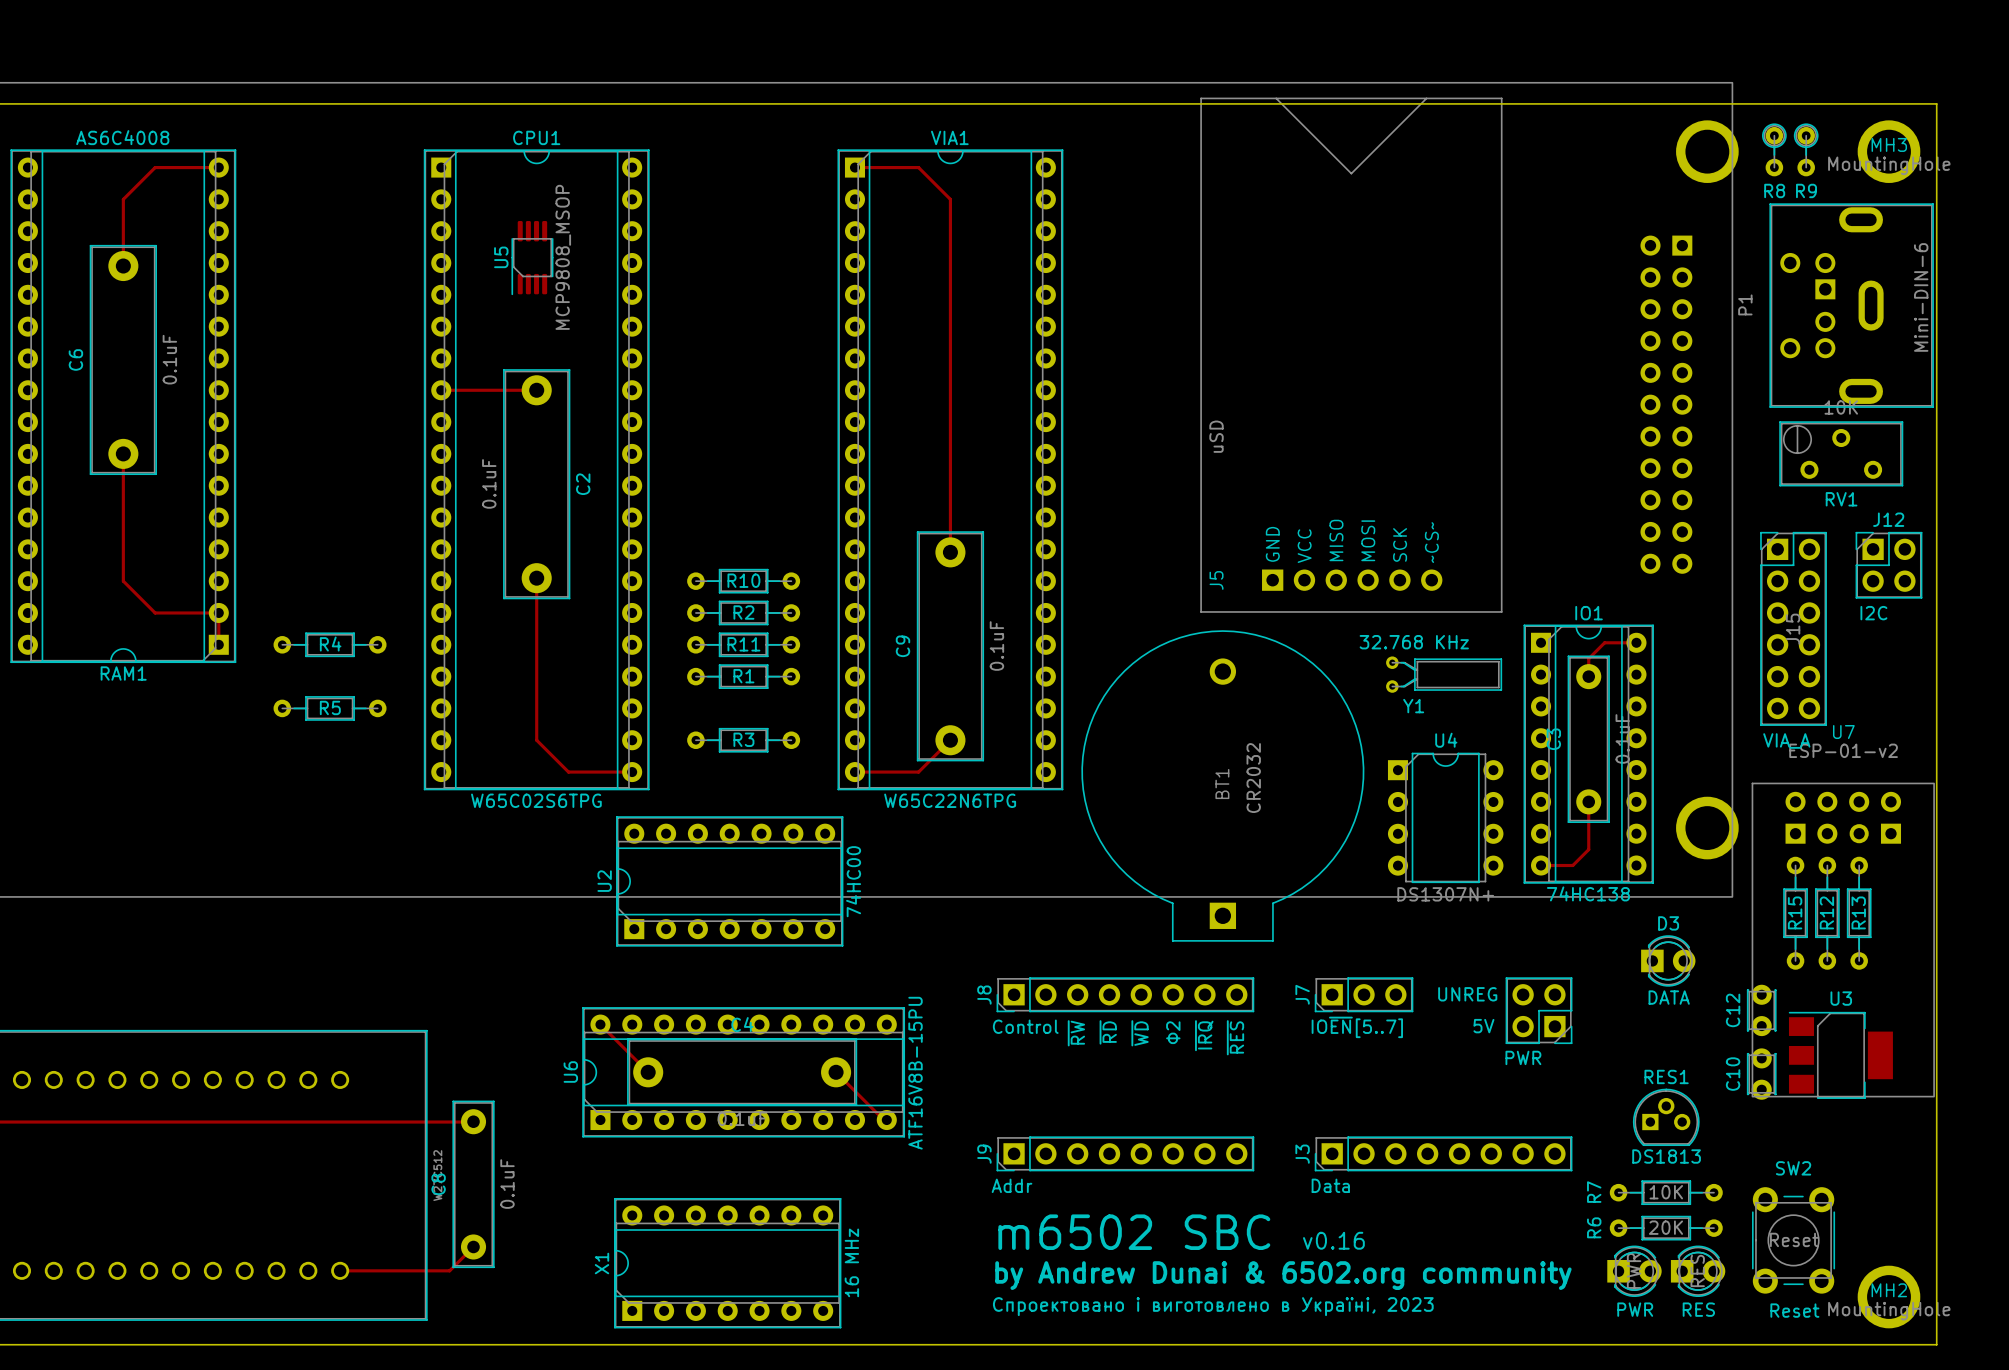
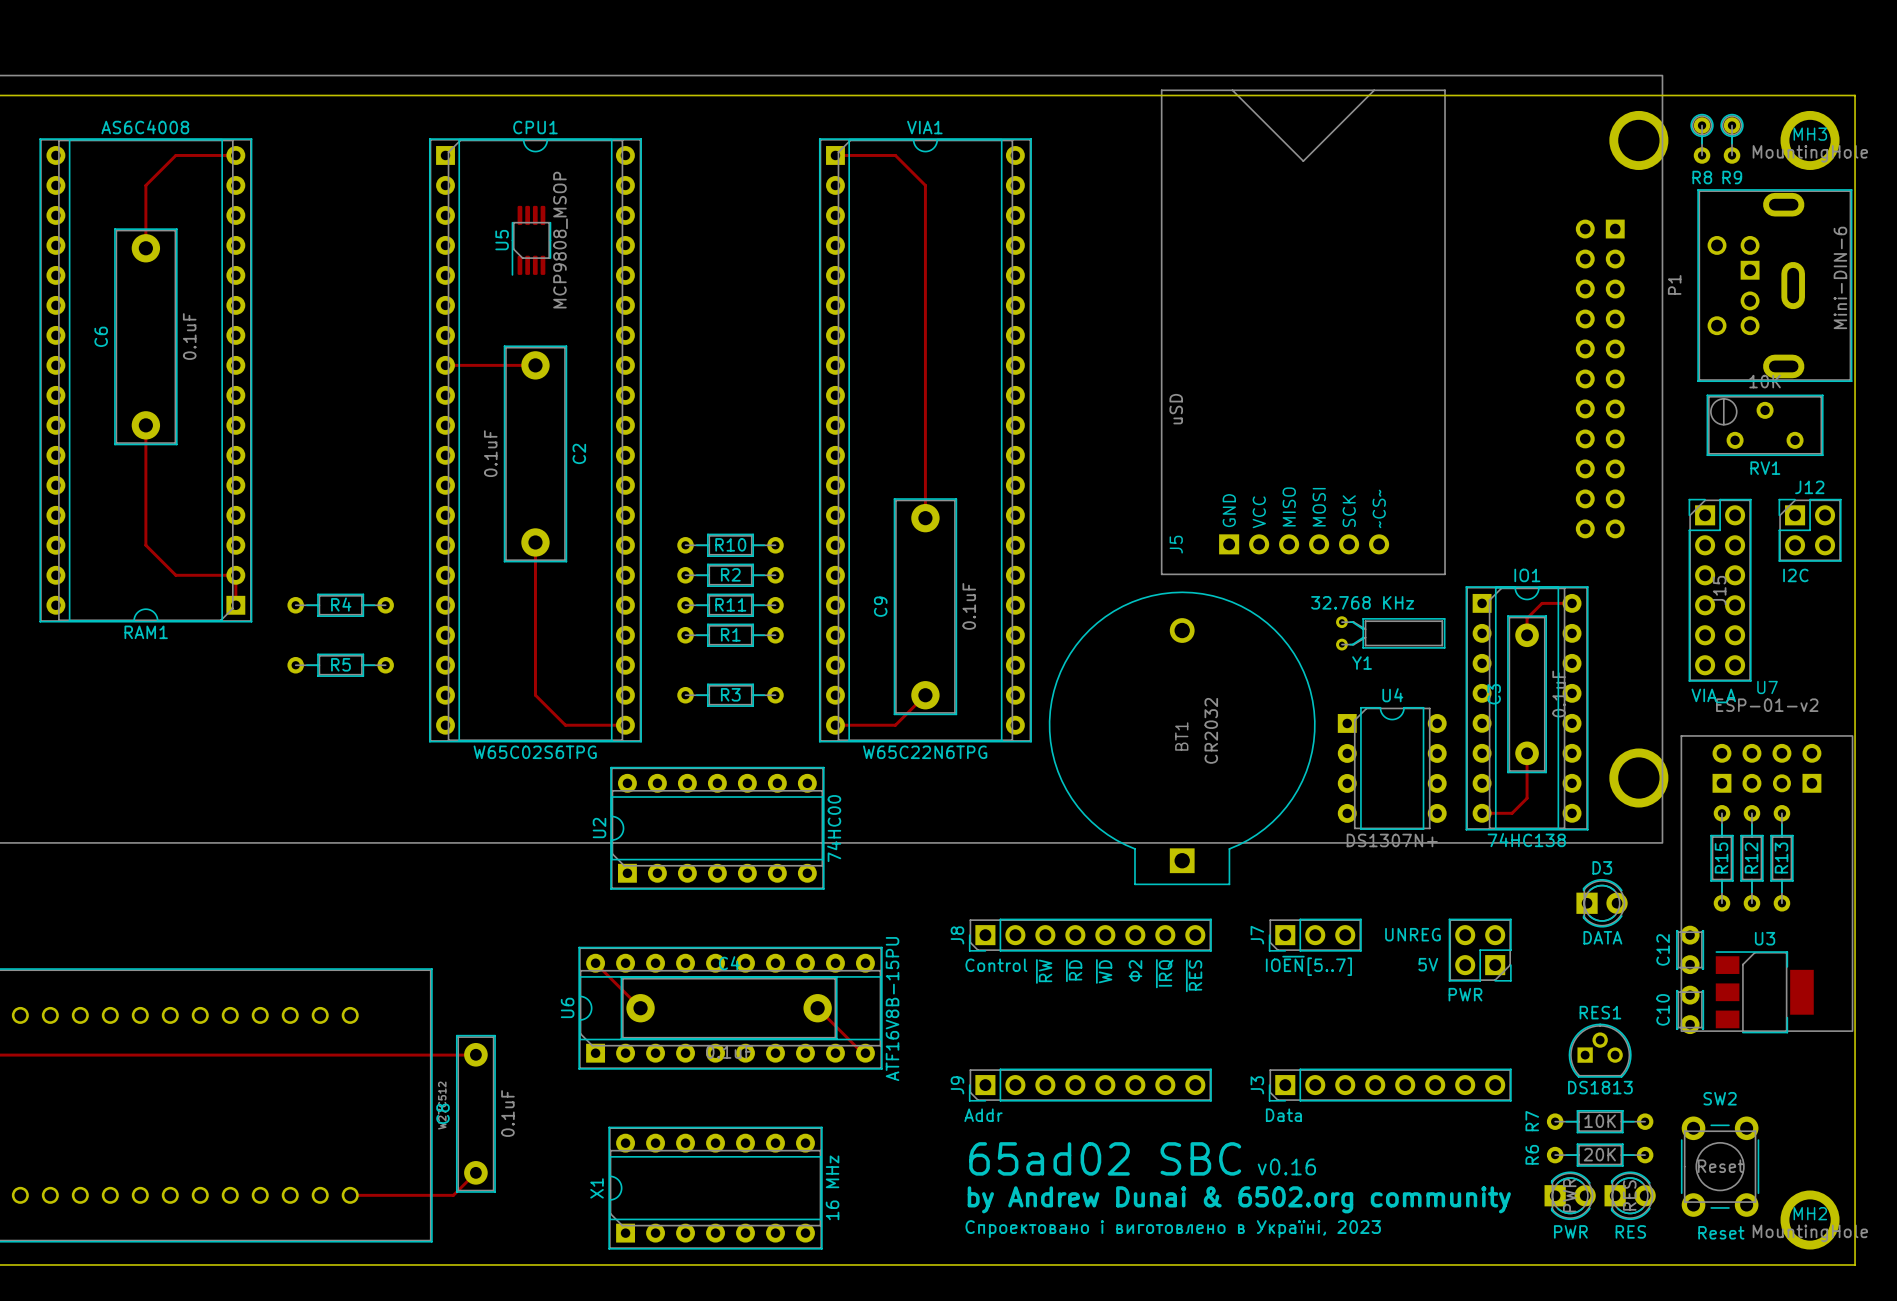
text: m6502 SBC (1134, 1232) -> 65ad02 SBC (1105, 1158)

